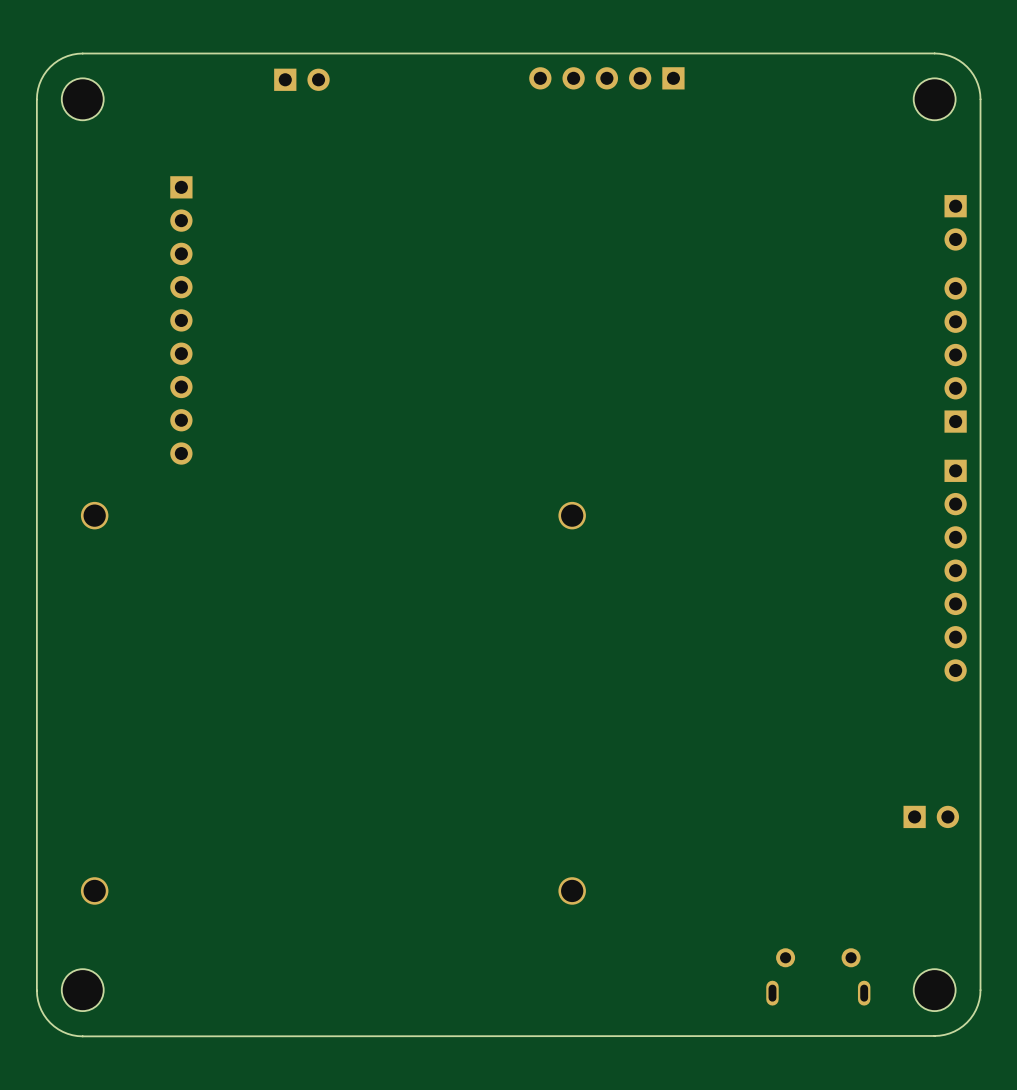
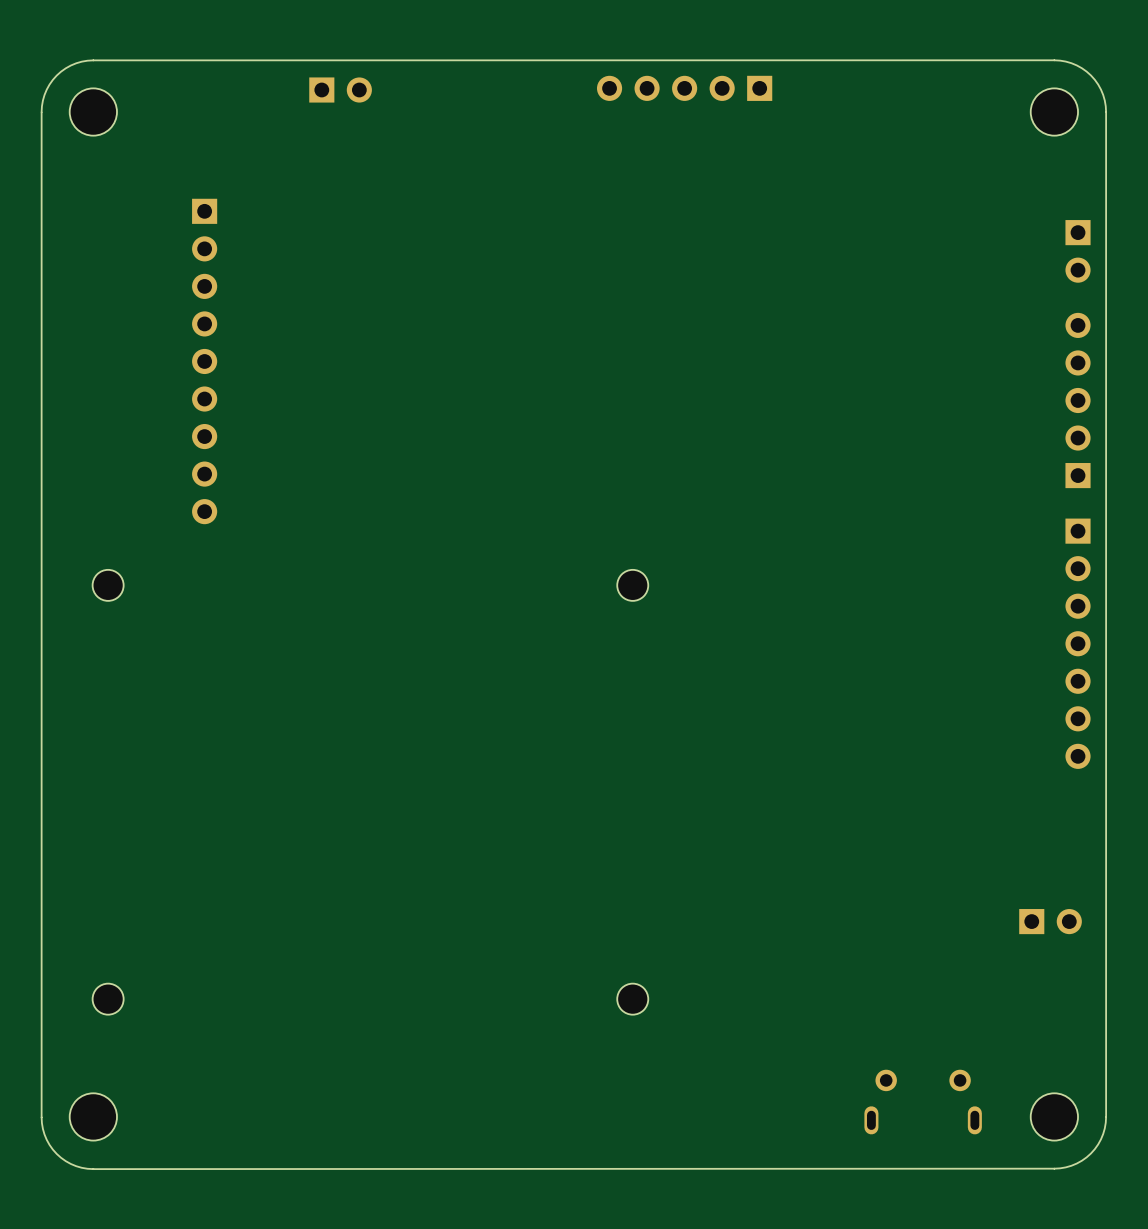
part footprint: [80, 501, 109, 530] -> [92, 569, 124, 601]
part footprint: [558, 501, 586, 530] -> [617, 569, 649, 601]
part footprint: [80, 877, 109, 905] -> [92, 983, 124, 1015]
part footprint: [558, 877, 586, 905] -> [617, 983, 649, 1015]

